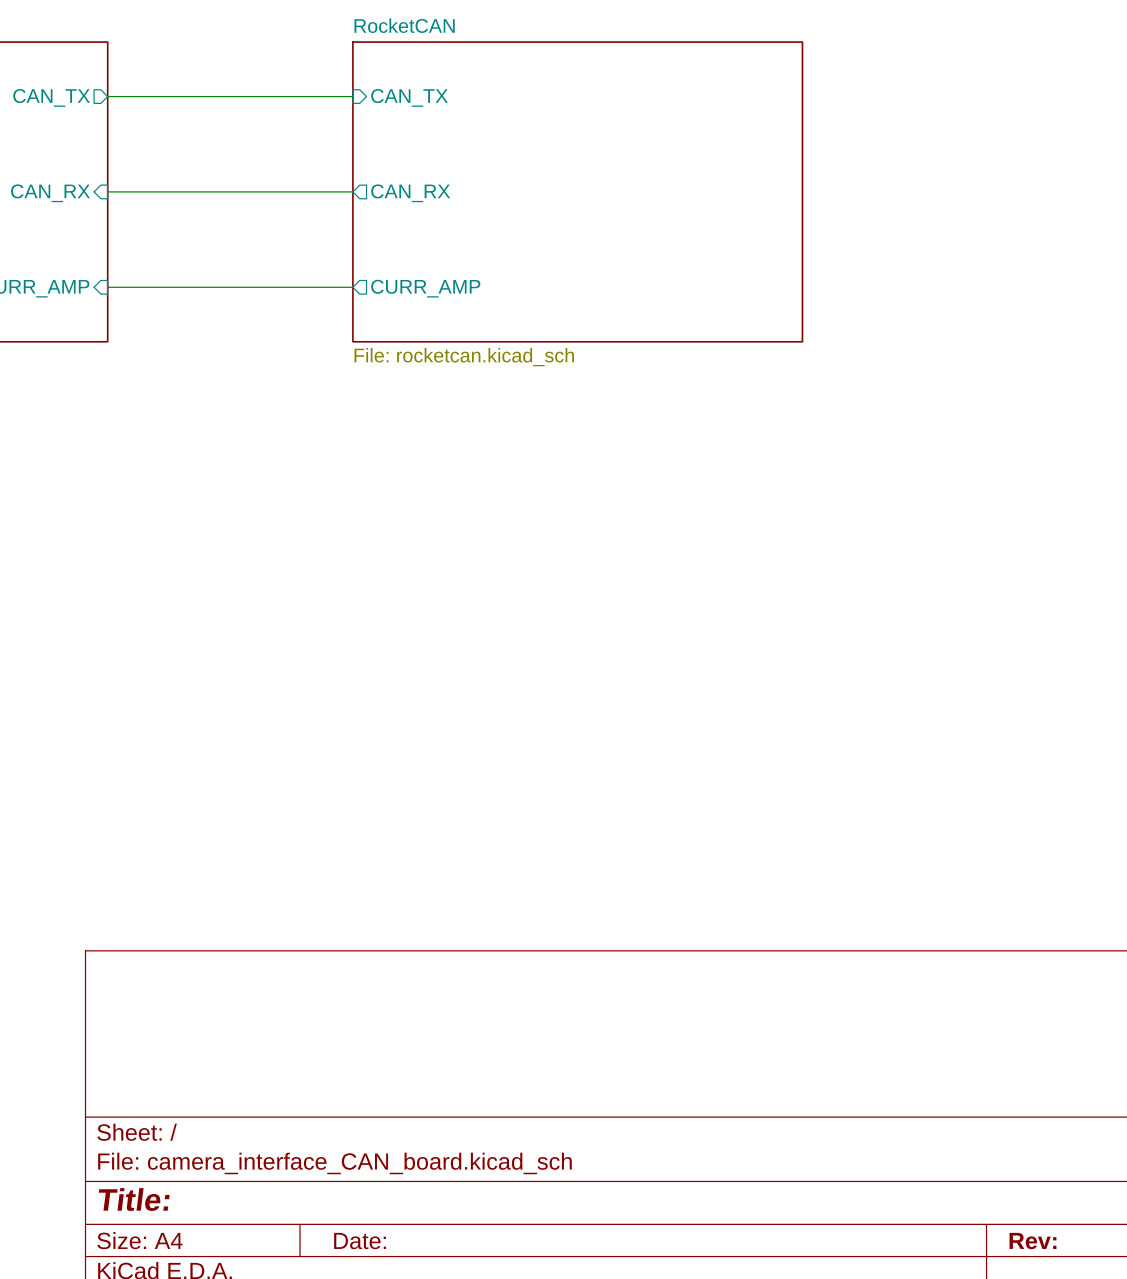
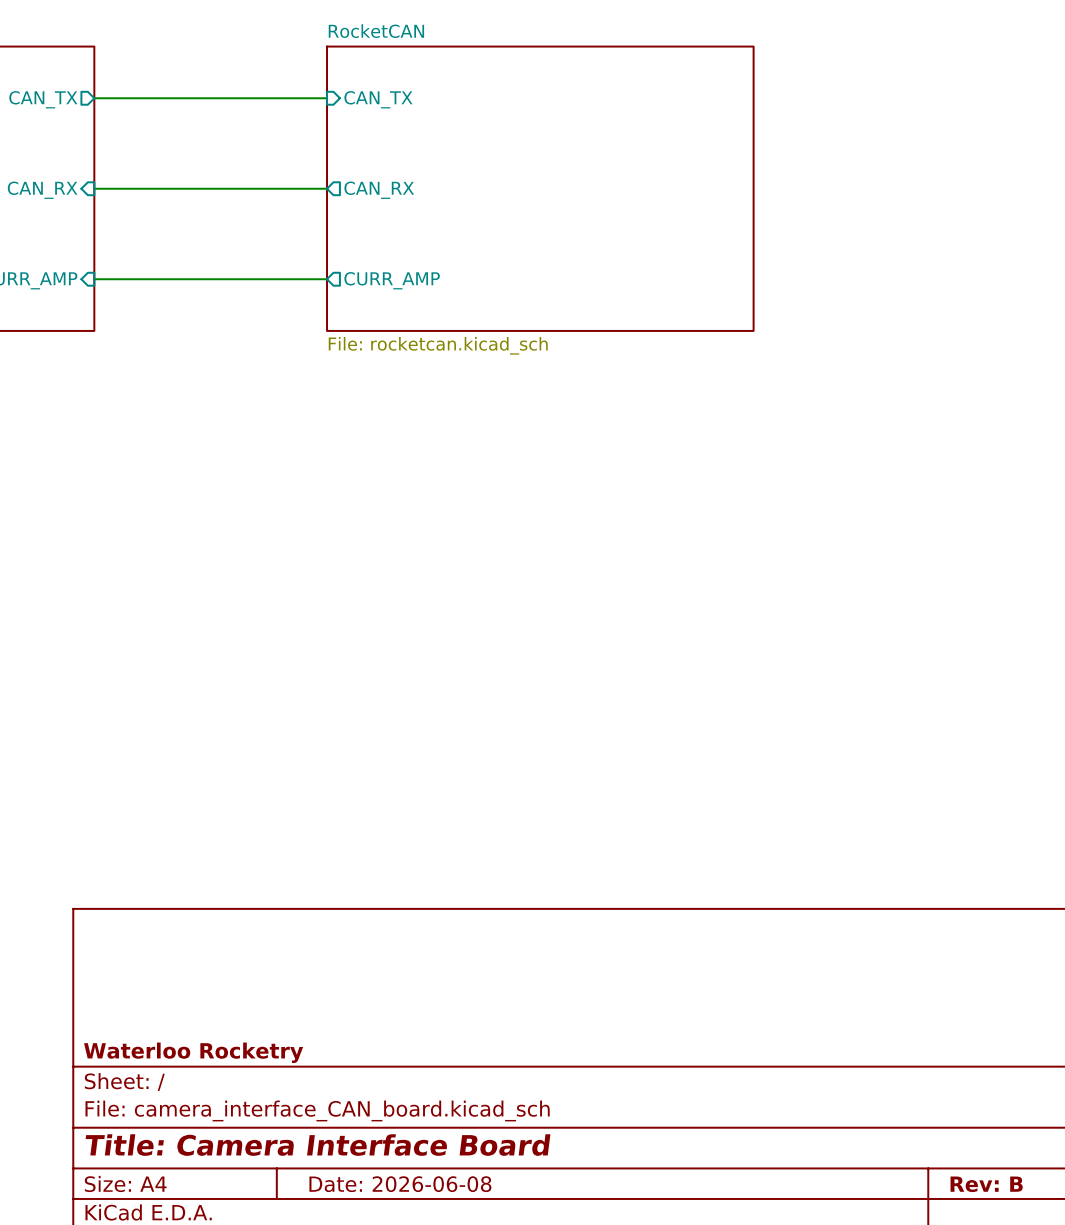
title block: none -> Waterloo Rocketry (193, 1052)
title block: Title: (134, 1199) -> Title: Camera Interface Board (318, 1145)
title block: Date: (360, 1241) -> Date: 2026-06-08 (400, 1184)
title block: Rev: (1032, 1241) -> Rev: B (986, 1184)

